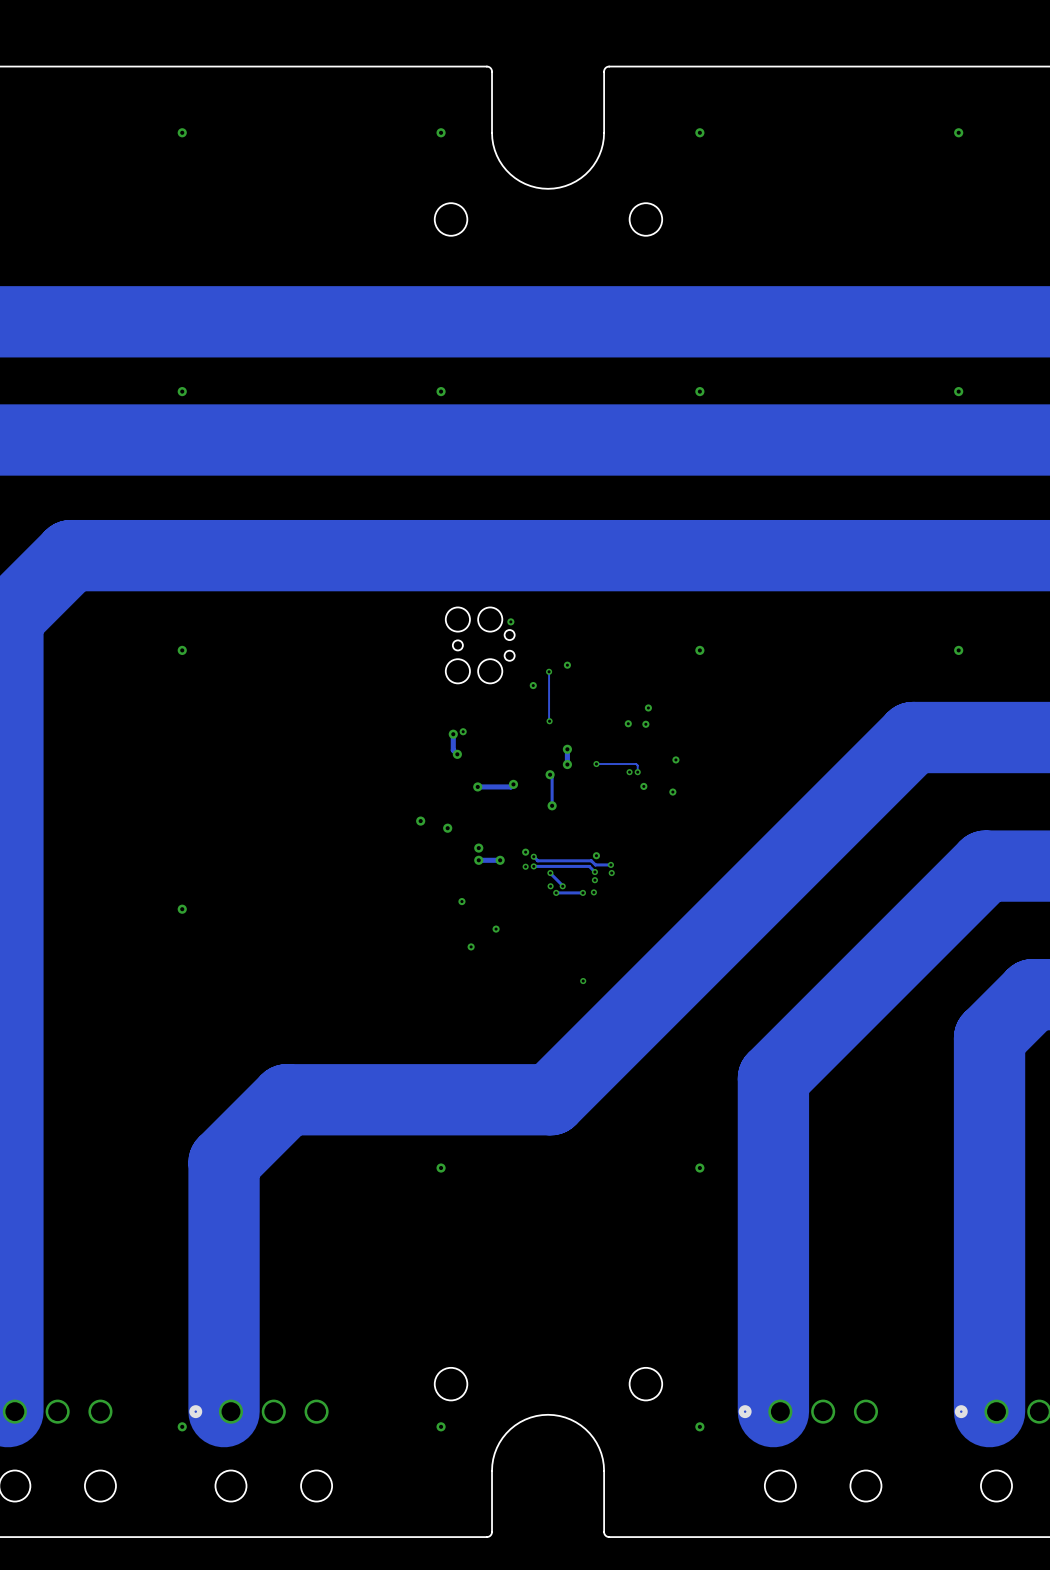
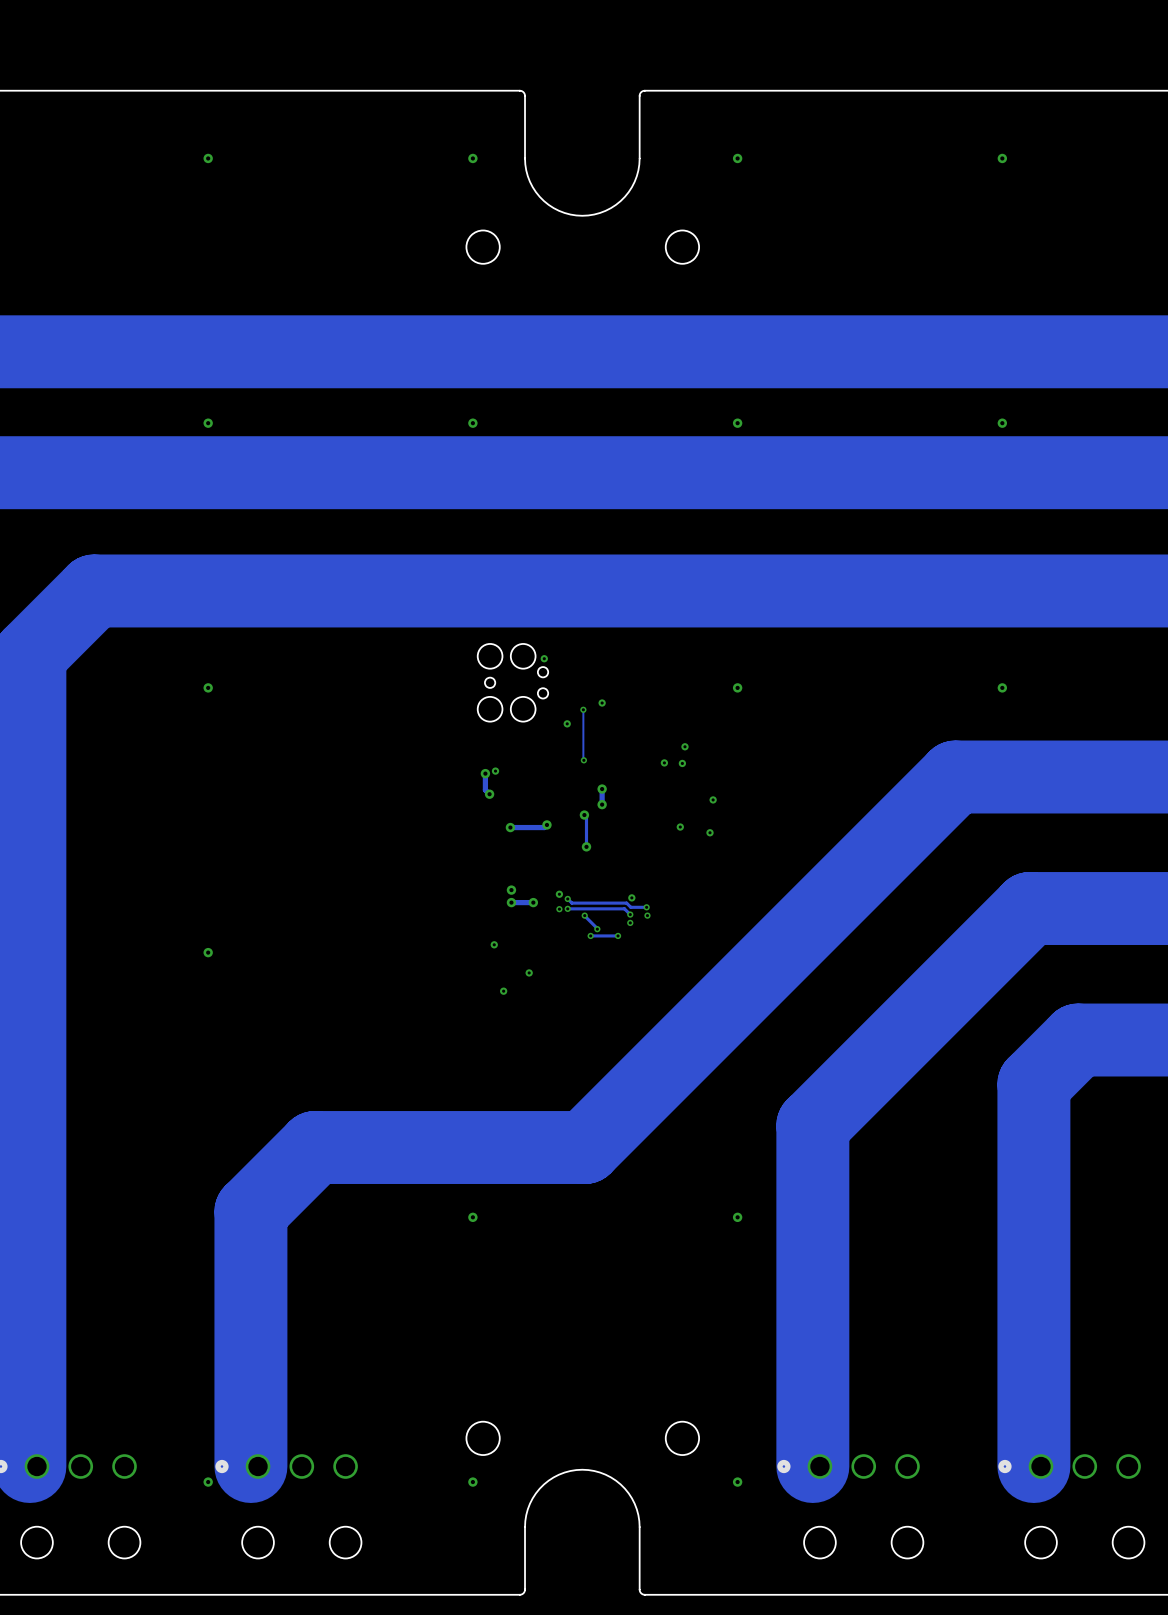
track: (596, 764) (636, 764) (637, 772) -> none
via: (596, 764) -> none
via: (629, 772) -> none
via: (637, 772) -> none
via: (420, 821) -> none
via: (447, 828) -> none
via: (550, 886) -> none
via: (593, 892) -> none
via: (583, 981) -> none

